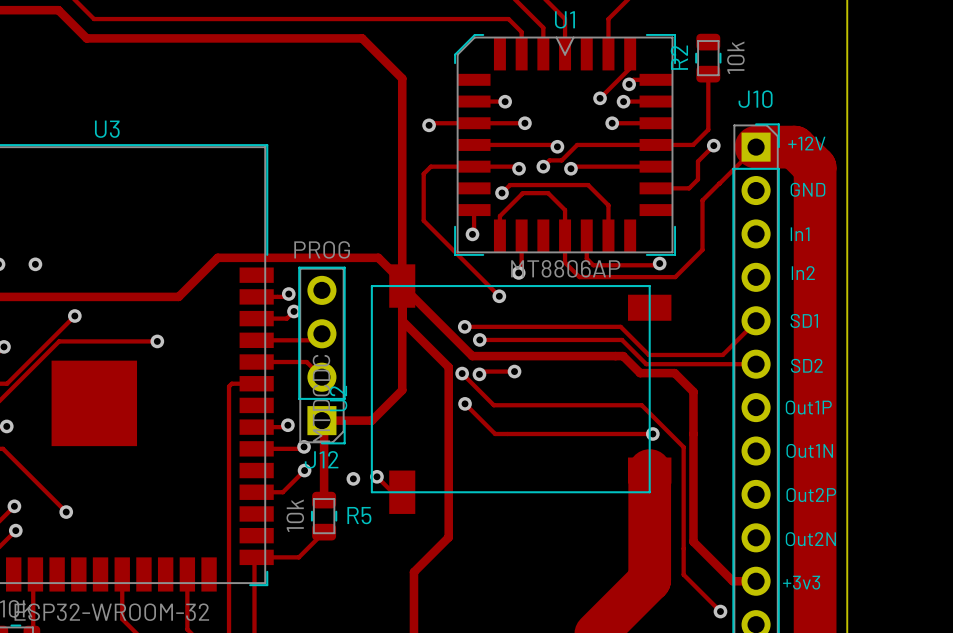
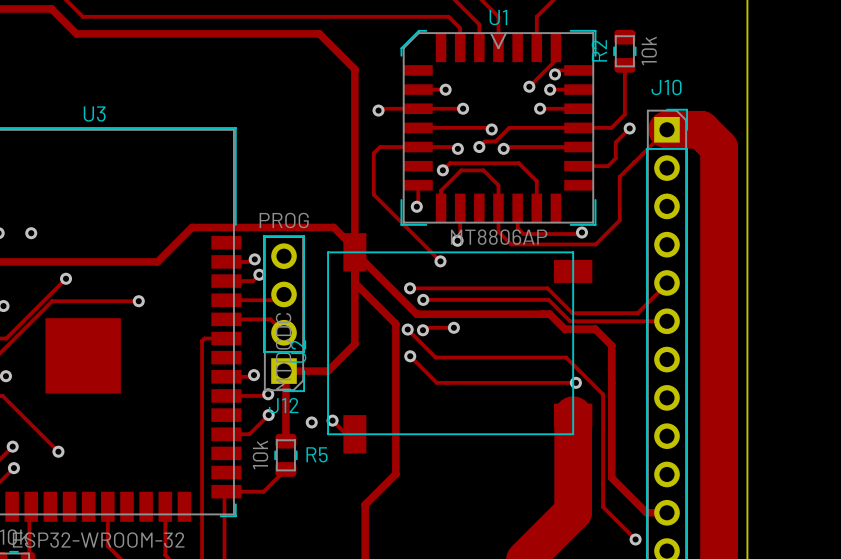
text: +12V (806, 143) -> none
text: GND (807, 189) -> none
text: In1 (800, 234) -> none
text: In2 (803, 273) -> none
text: SD1 (804, 320) -> none
text: SD2 (806, 365) -> none
text: Out1P (808, 407) -> none
text: Out1N (809, 450) -> none
text: Out2P (811, 495) -> none
text: Out2N (810, 539) -> none
text: +3v3 (801, 582) -> none

